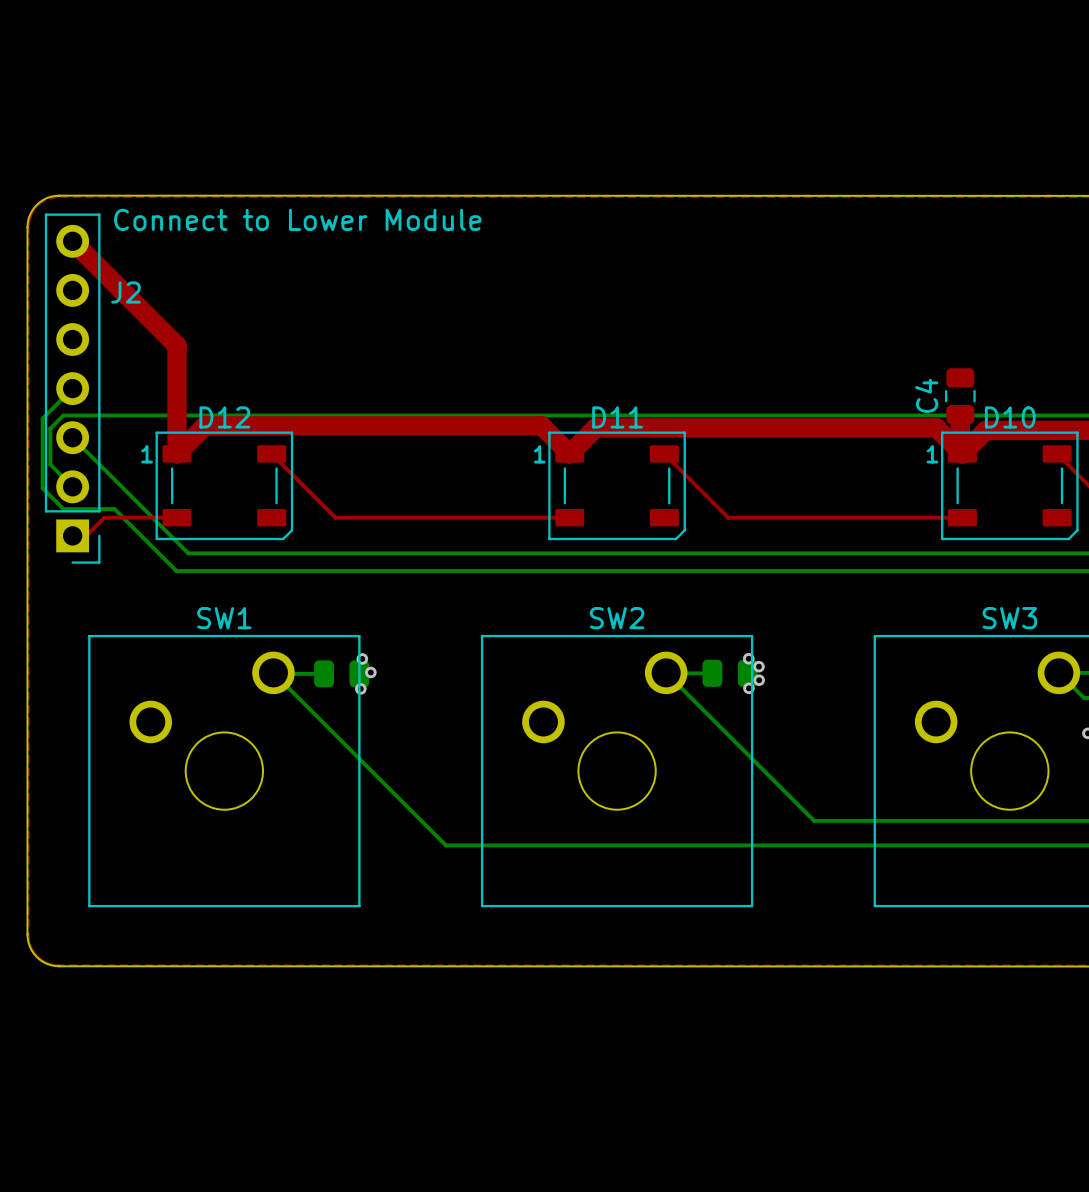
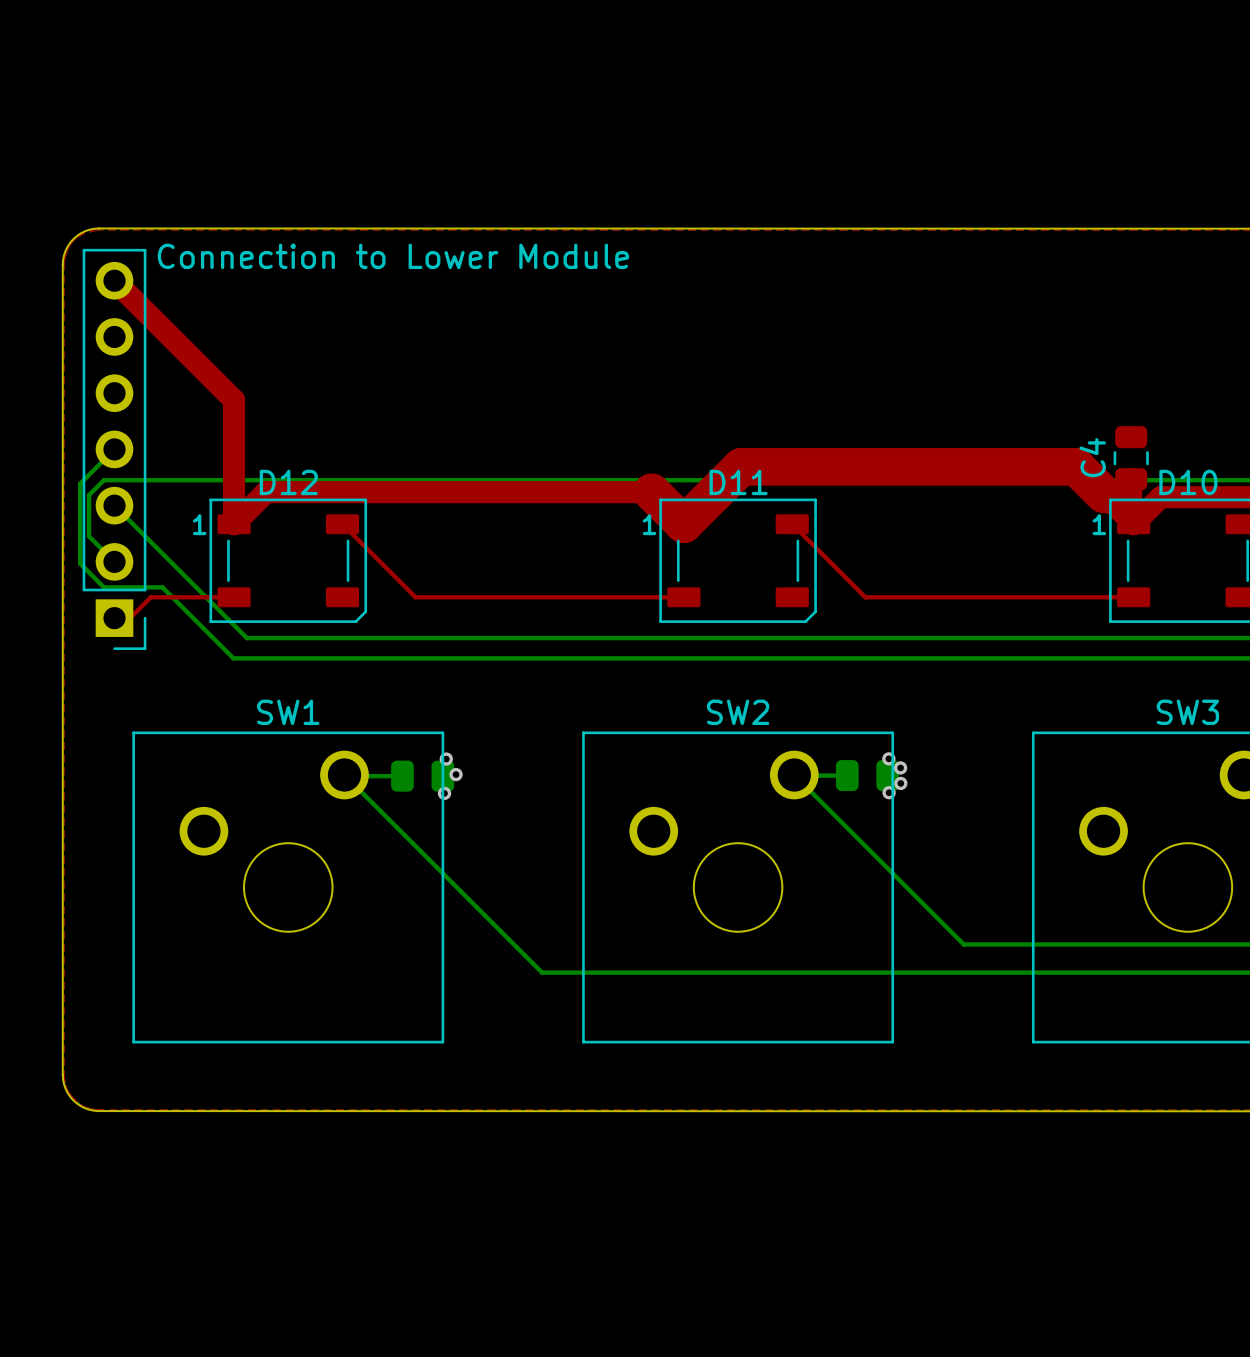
J2 value: Connect to Lower Module (297, 219) -> Connection to Lower Module (393, 256)
J2 name: J2 (125, 292) -> none
top track width: thin (541, 425) (569, 453) (595, 427) -> thick (651, 492) (683, 524) (713, 494)
top track: (595, 427) (936, 427) -> (713, 494) (741, 466) (1076, 466) (1103, 494)

